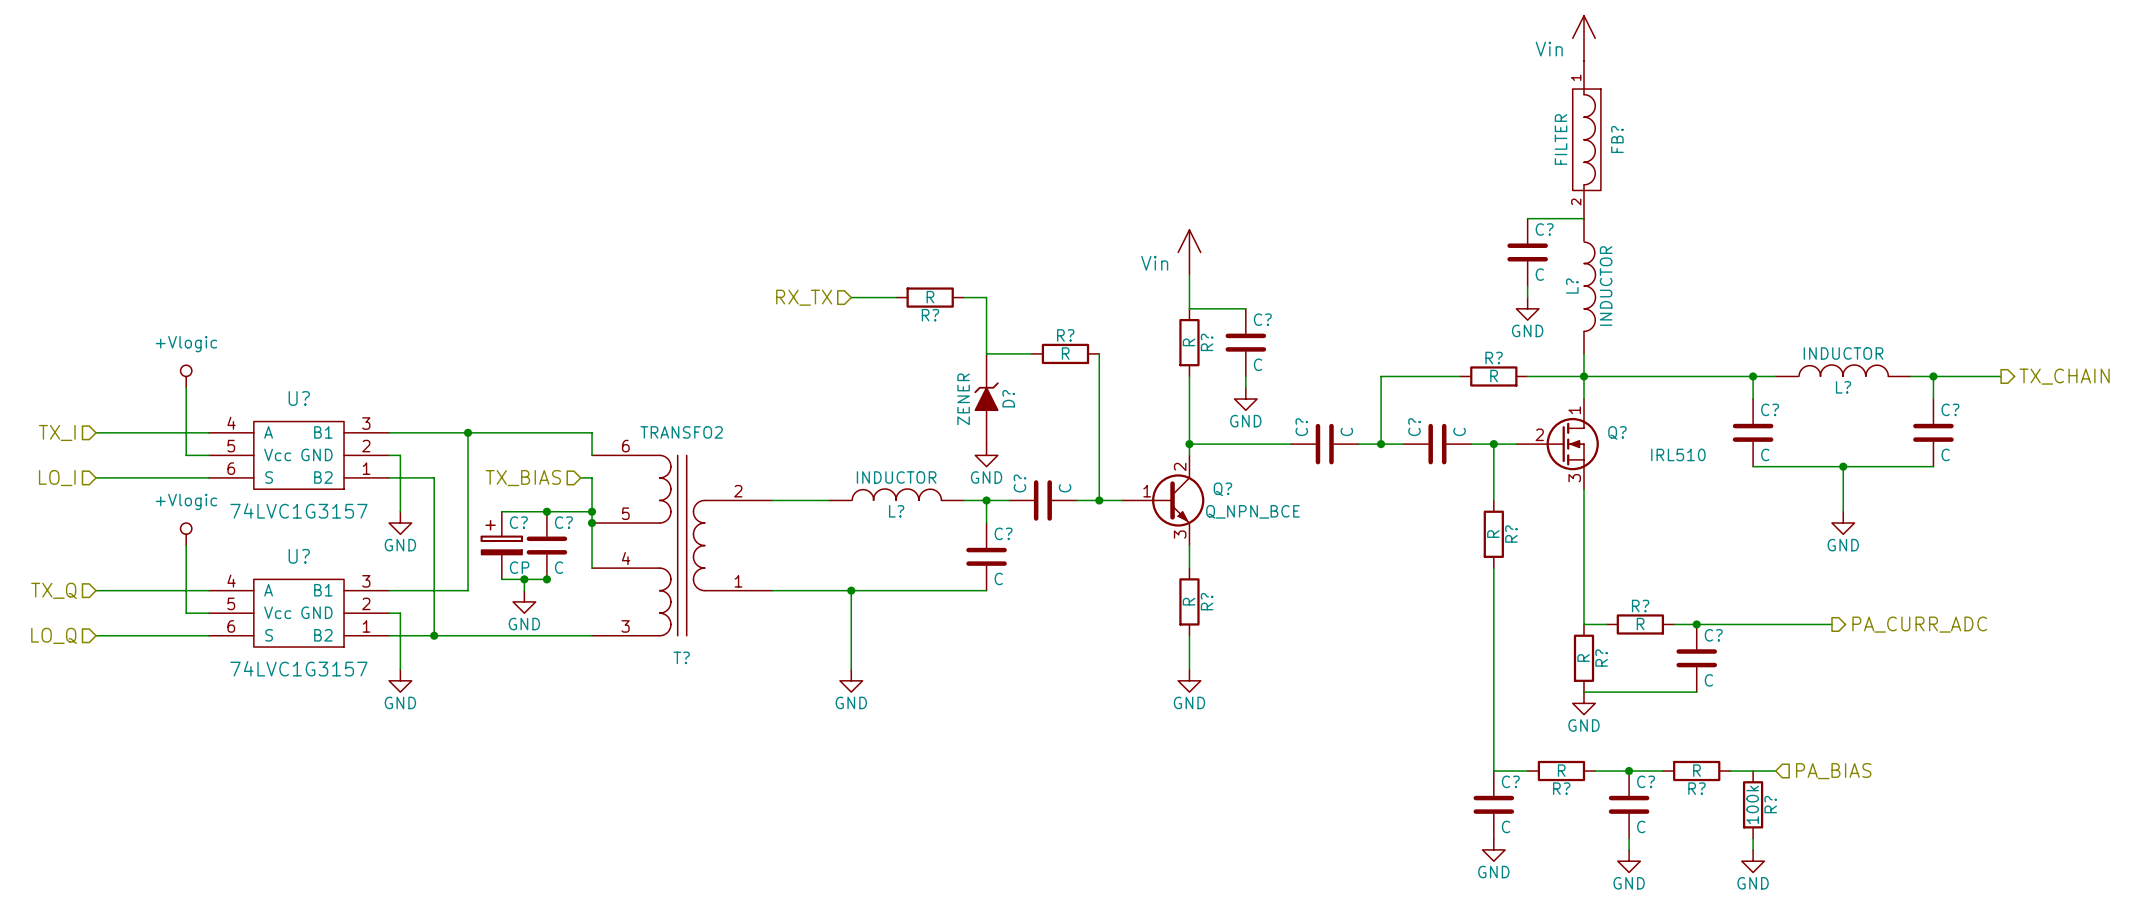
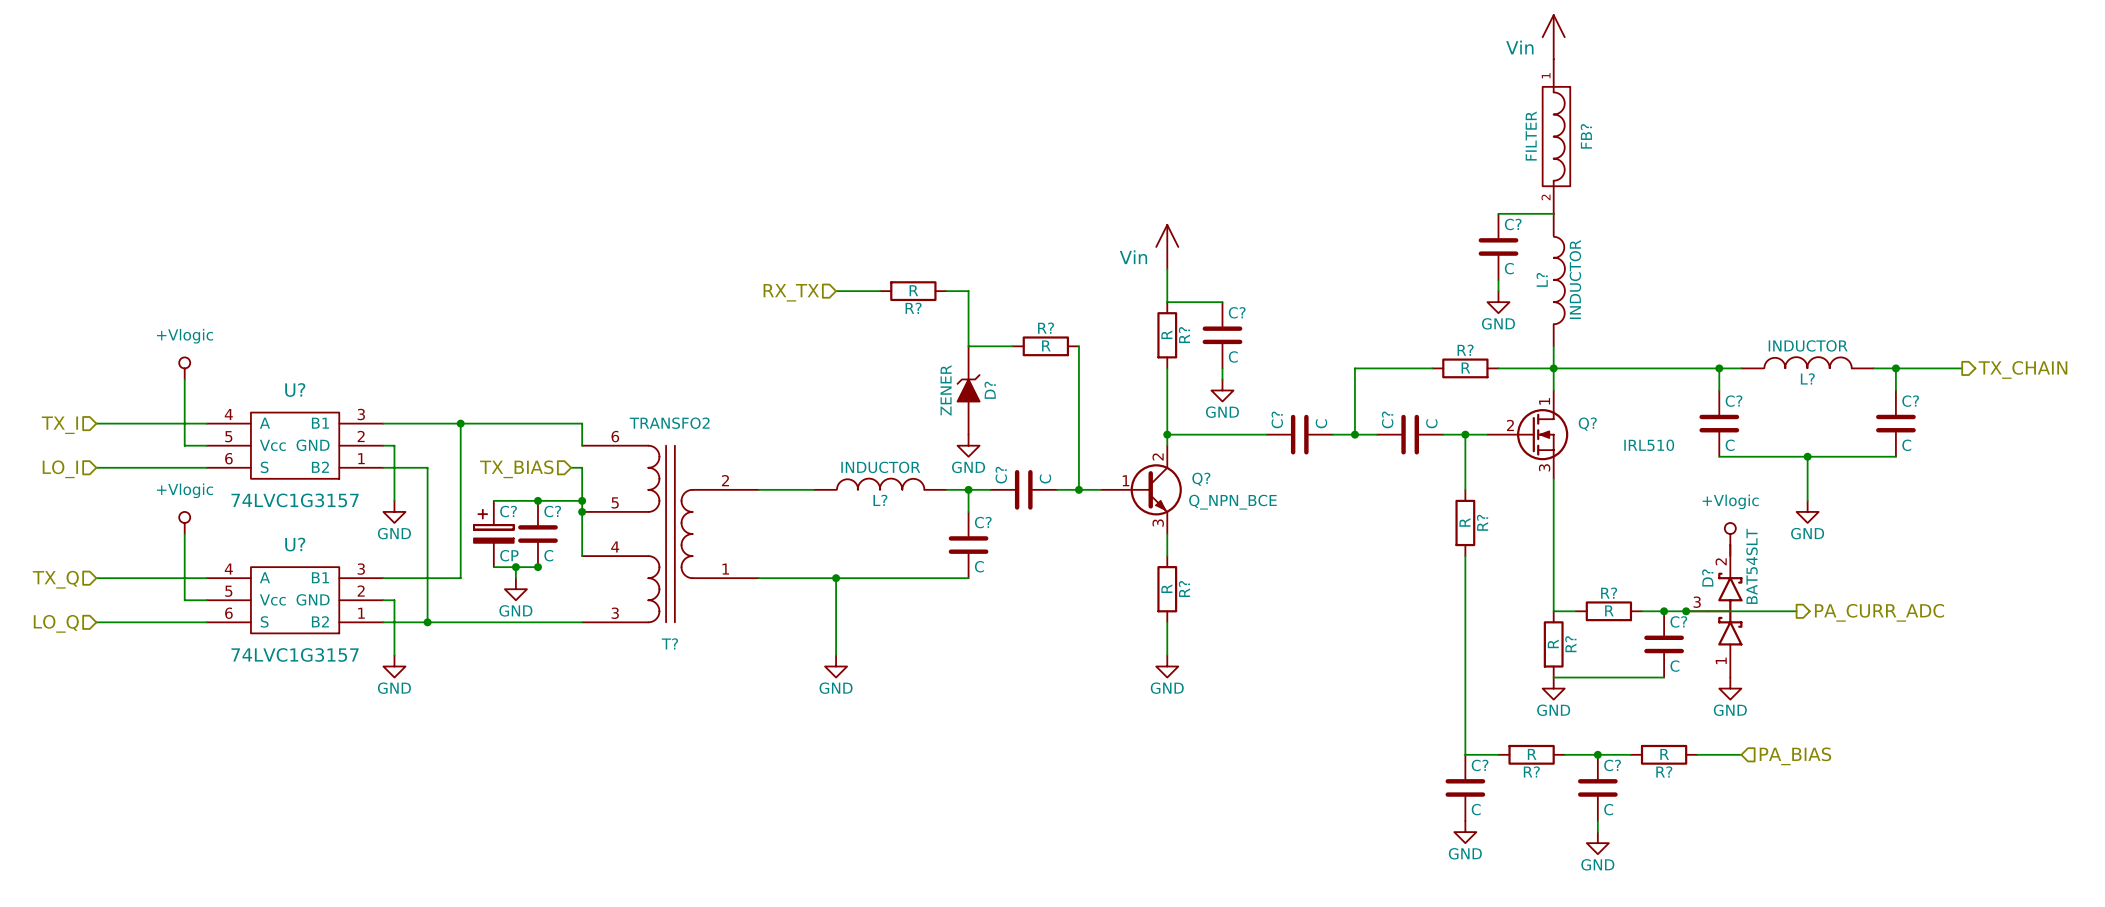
power symbol: none -> +Vlogic (1730, 534)
junction: none -> (1686, 611)
D?: none -> BAT54SLT (1714, 611)
R?: 100k (1753, 804) -> none
wire: (1753, 838) (1753, 849) -> none
power symbol position: GND (1753, 861) -> GND (1730, 688)

